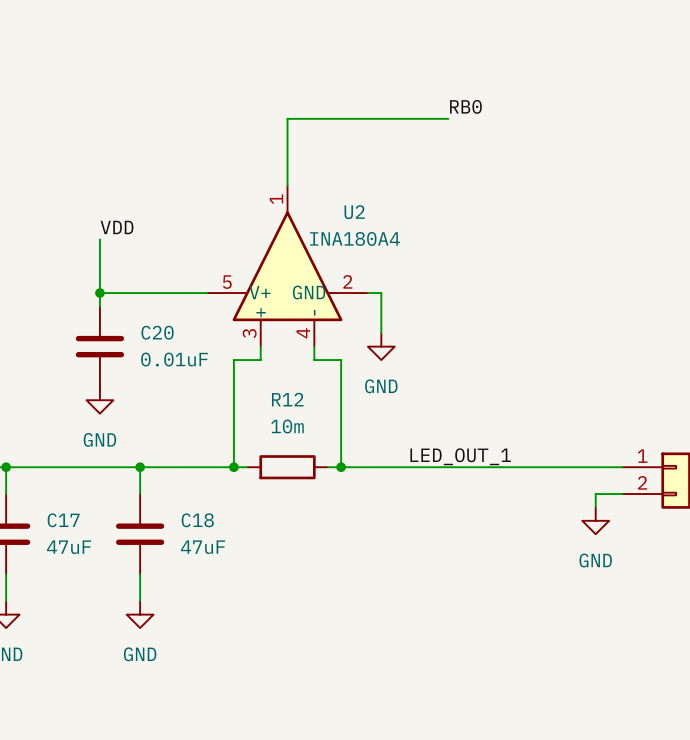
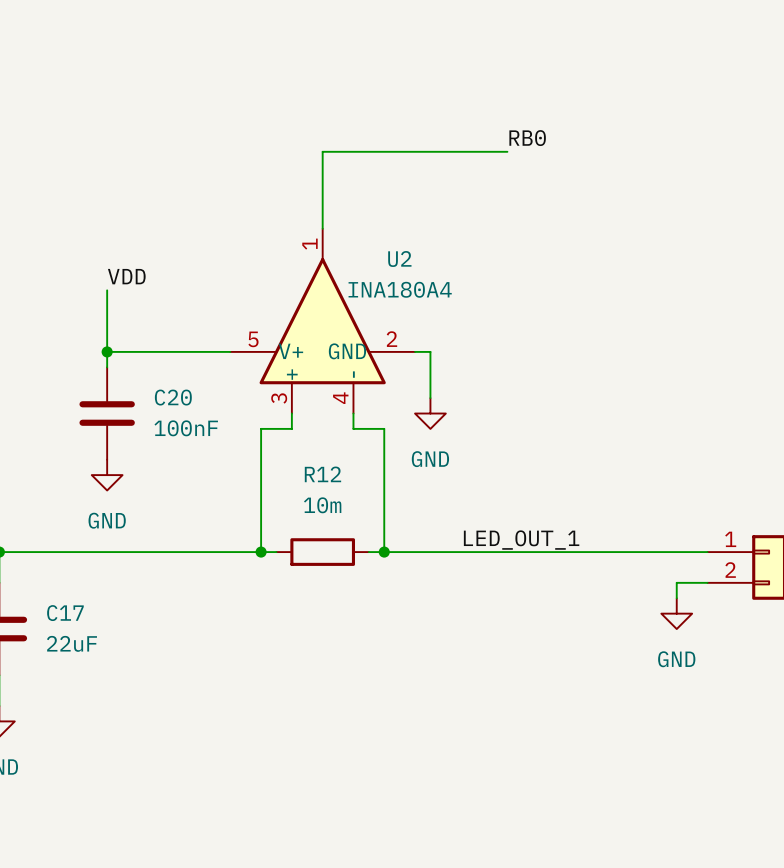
C20 value: 0.01uF (174, 359) -> 100nF (186, 428)
wire: (140, 467) (140, 494) -> none
junction: (140, 467) -> none
C18: 47uF (140, 534) -> none
C17 value: 47uF (69, 547) -> 22uF (71, 643)
wire: (140, 574) (140, 601) -> none
power symbol: GND (140, 614) -> none

